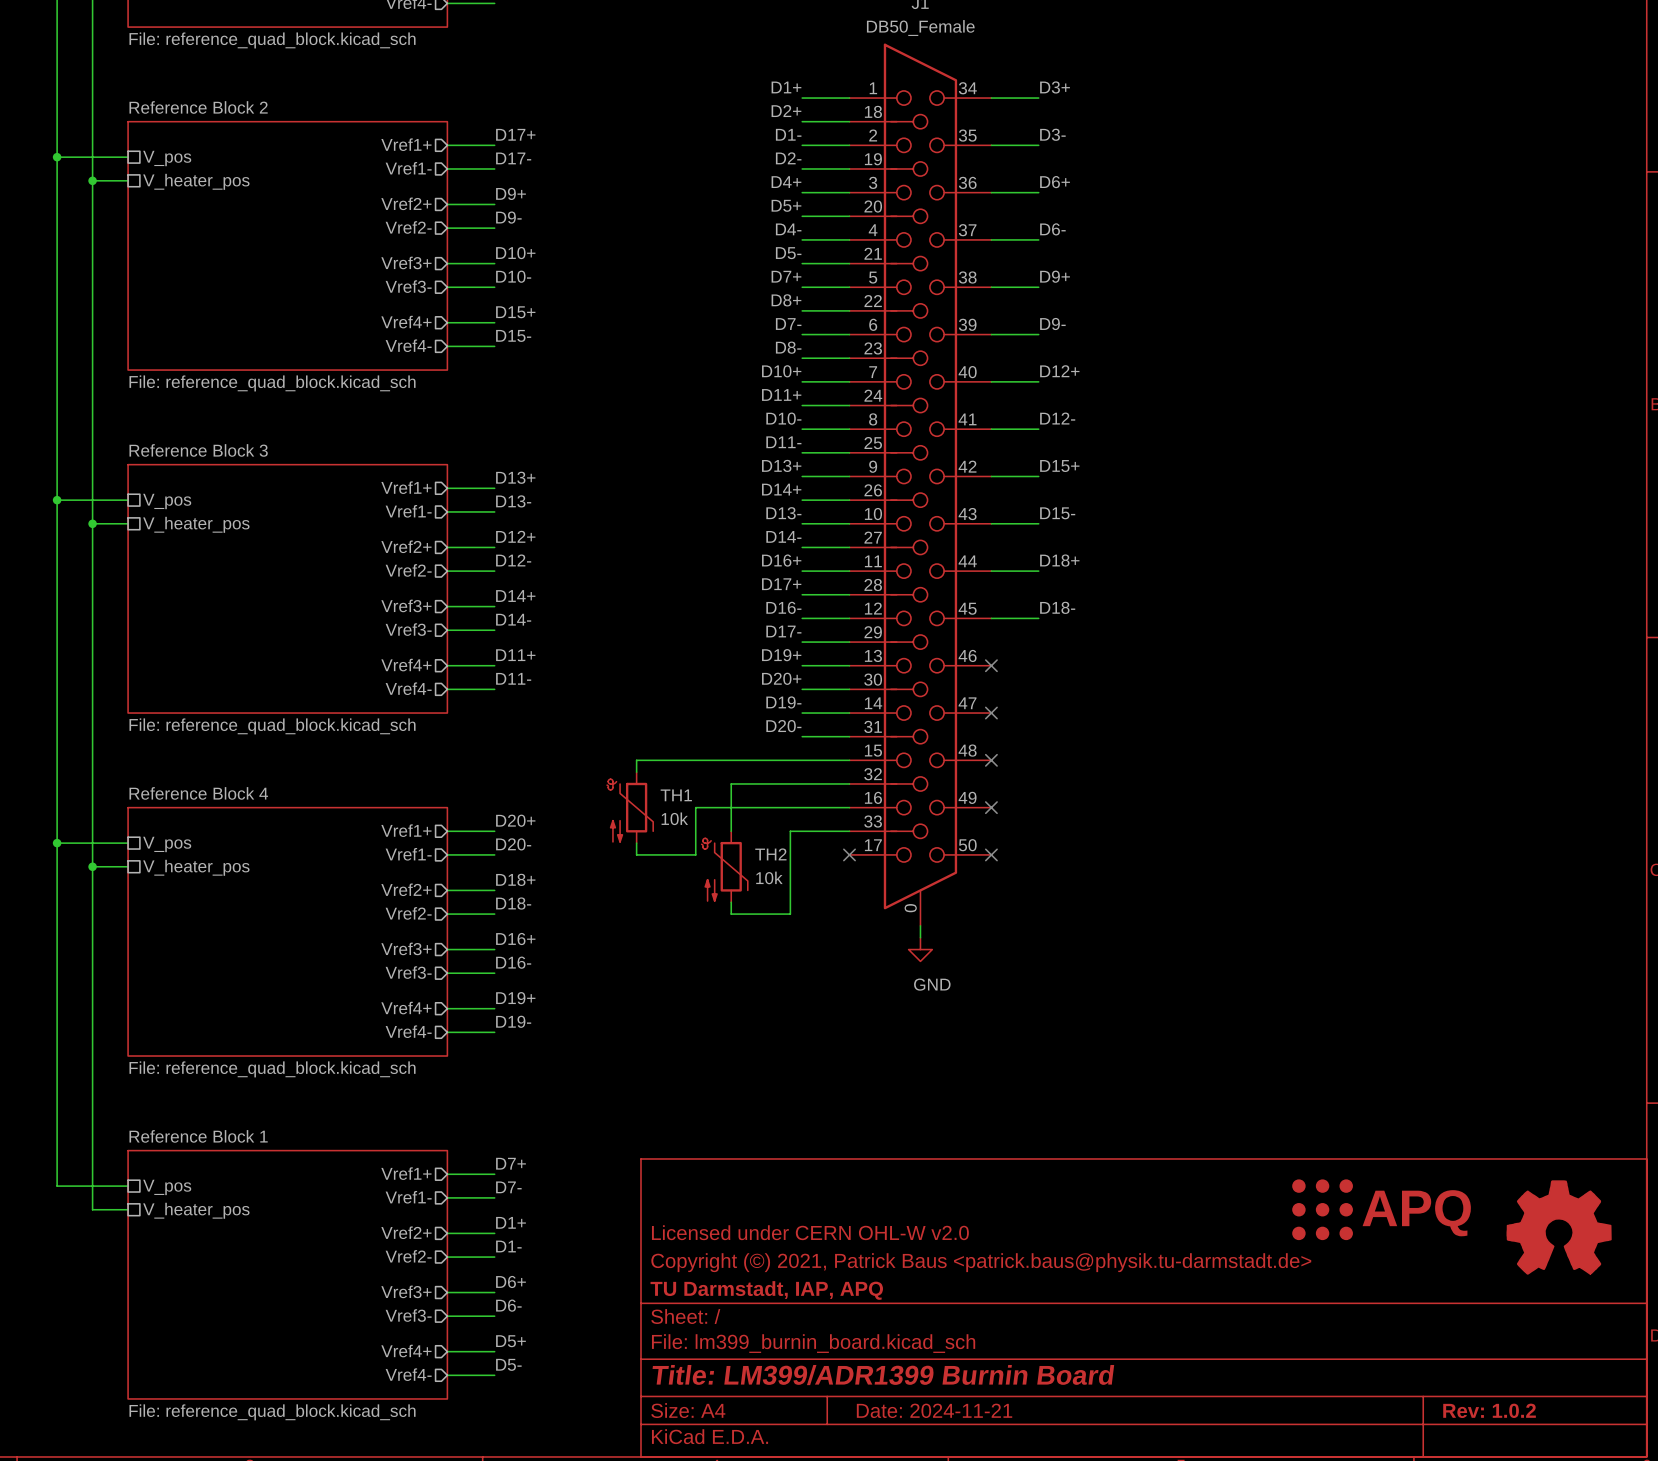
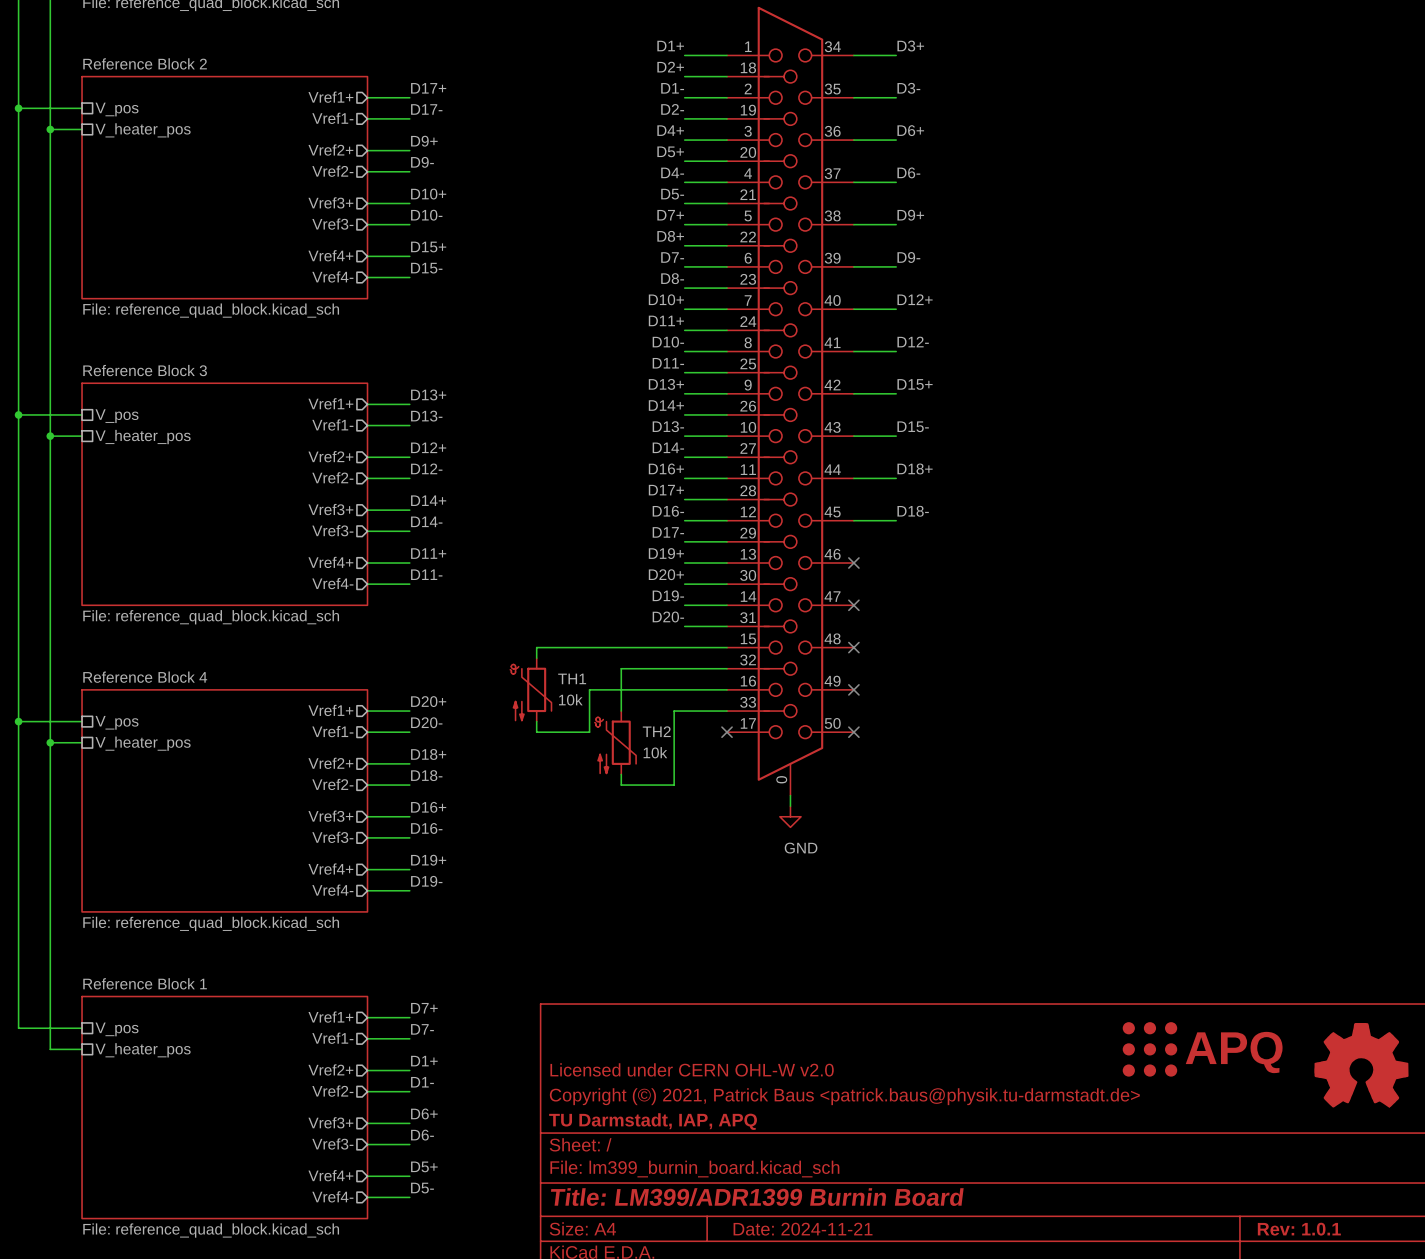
title block: Rev: 1.0.2 (1489, 1410) -> Rev: 1.0.1 (1299, 1229)

